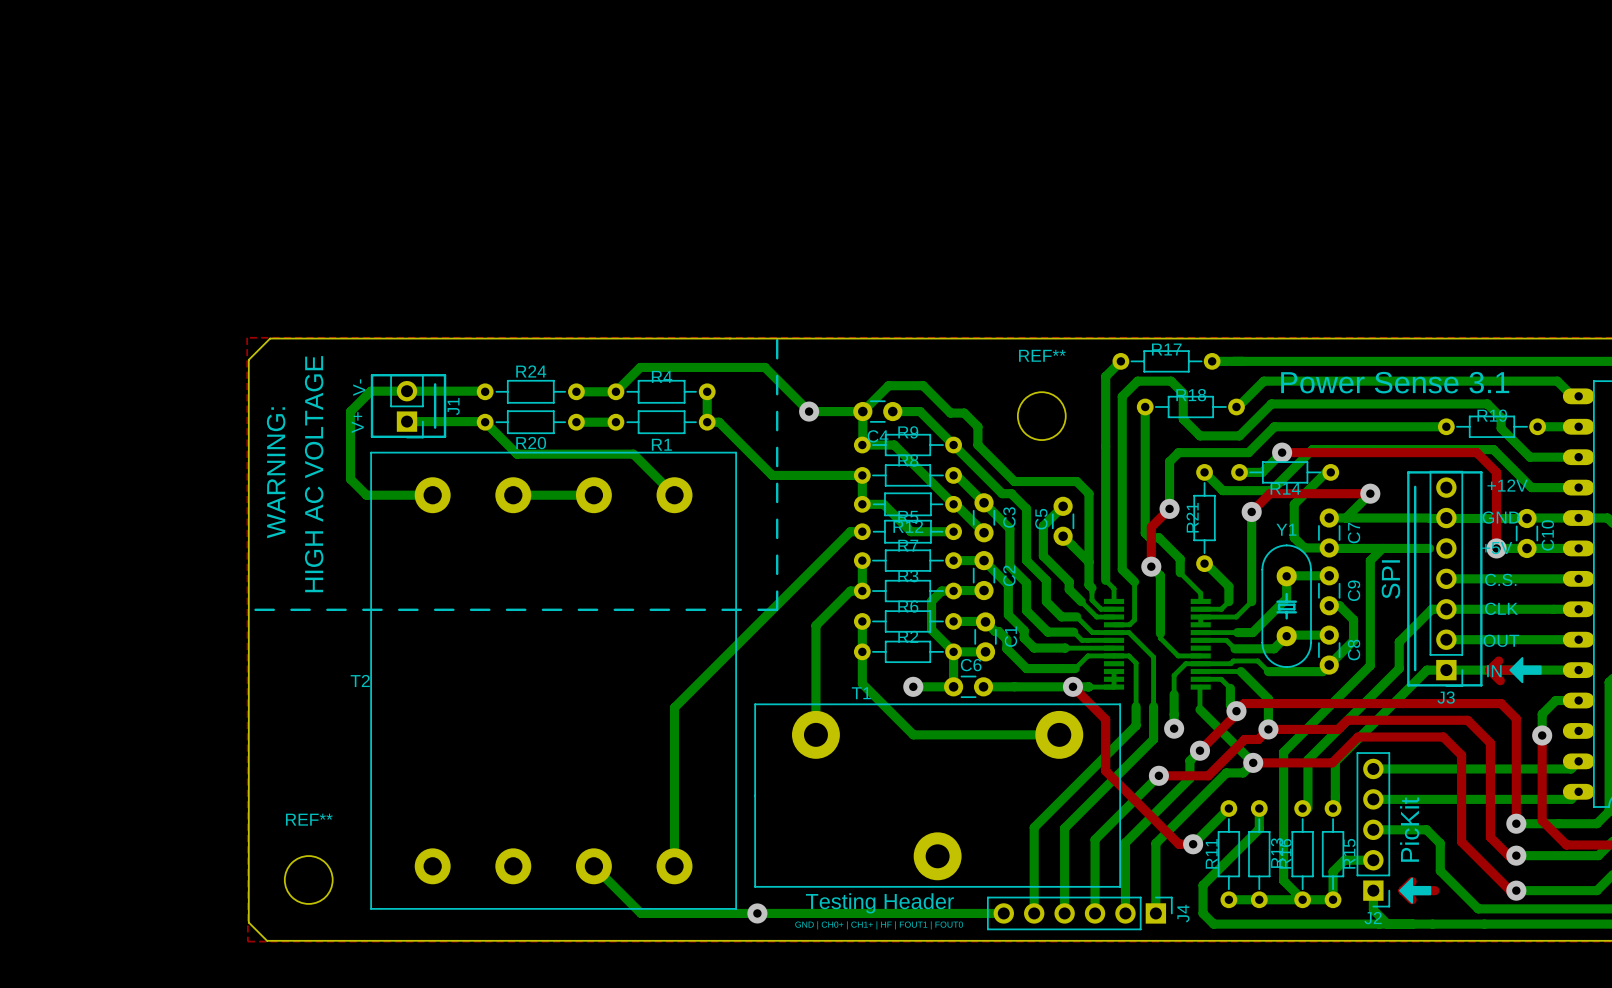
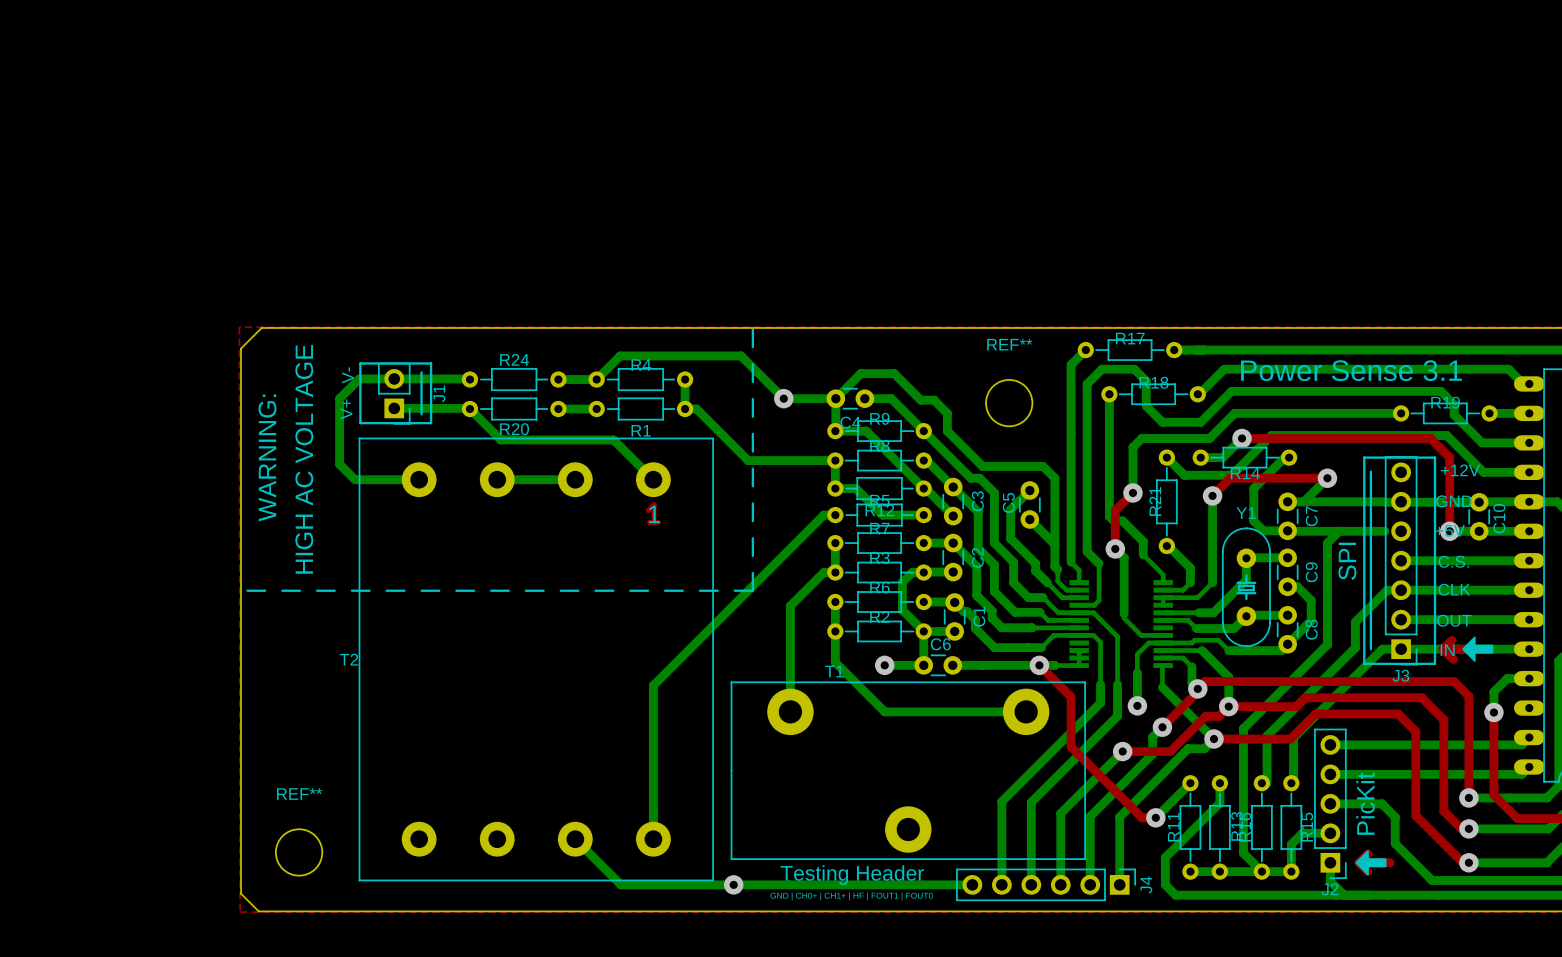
top track: none -> (648, 510) (654, 504) (654, 522)
text: none -> 1 (654, 514)
top track: none -> (649, 522) (658, 522)

